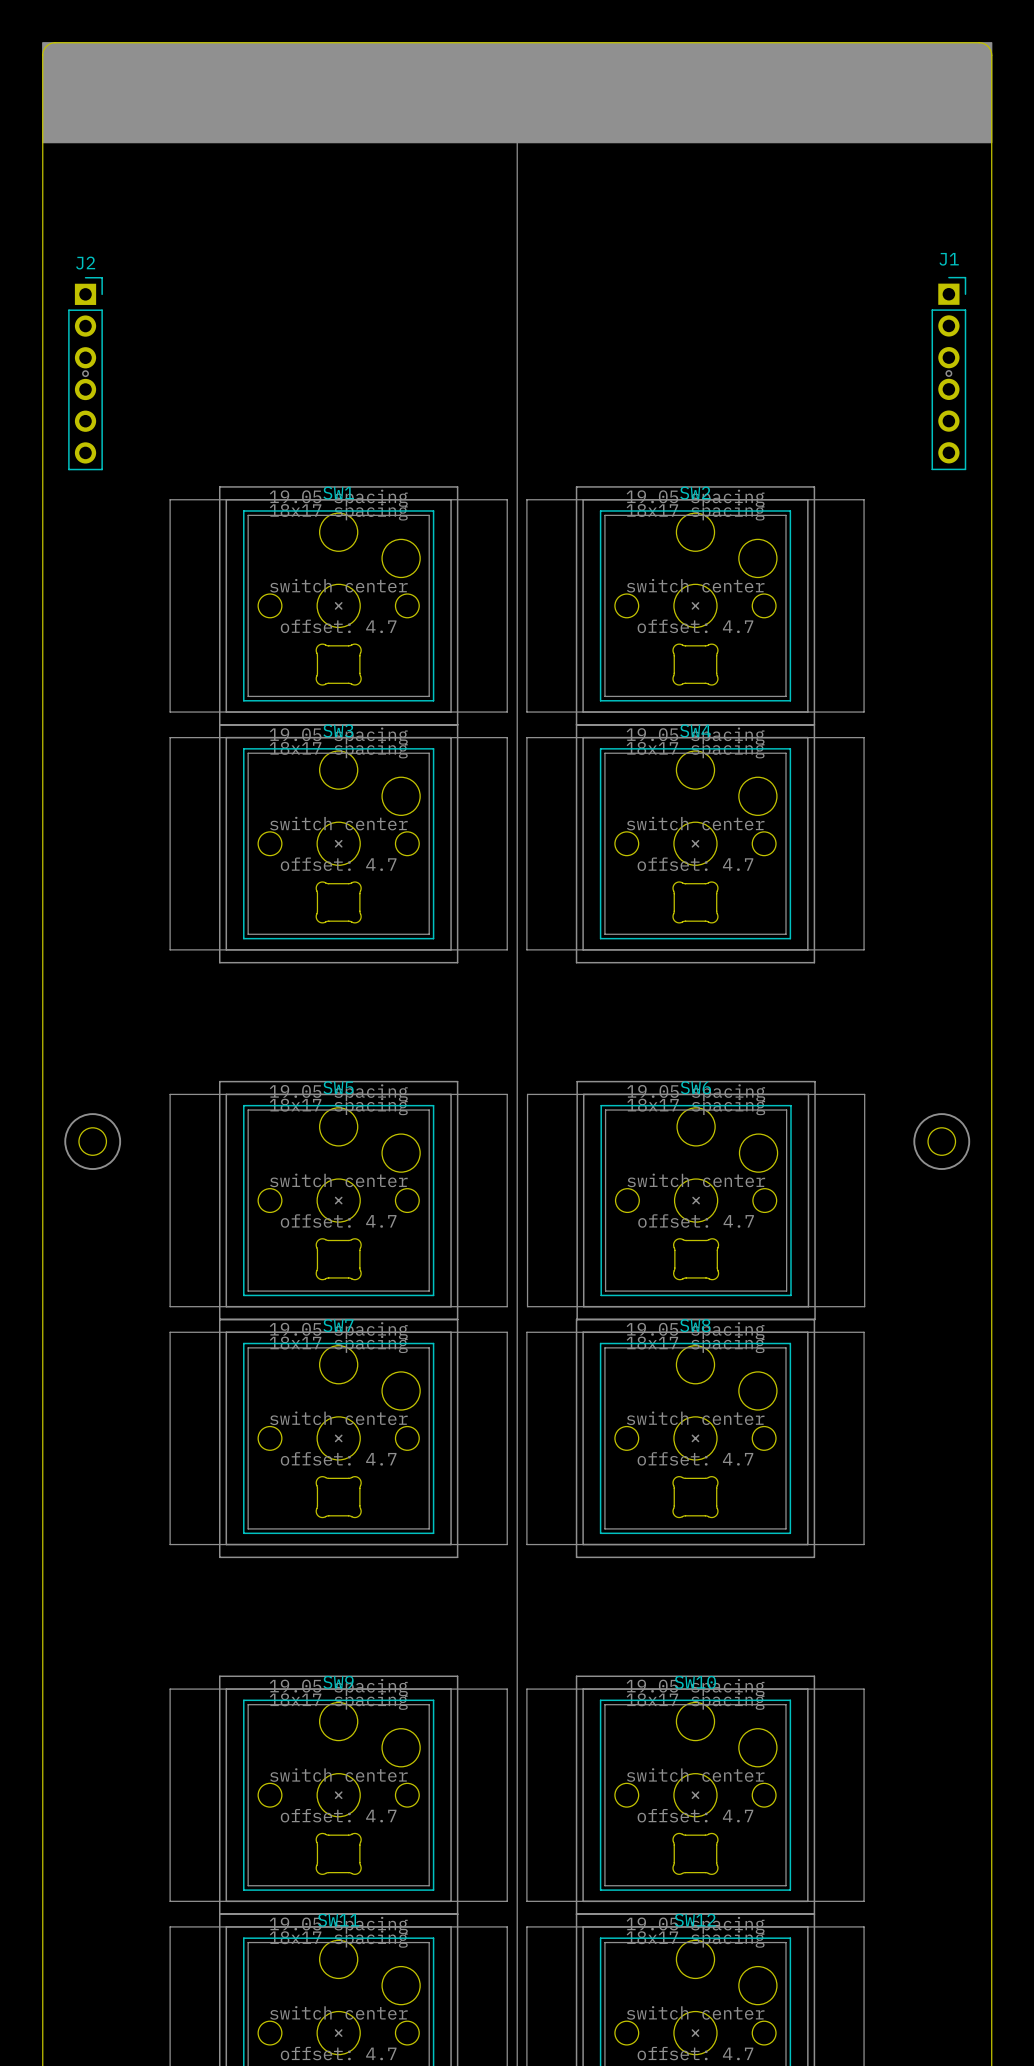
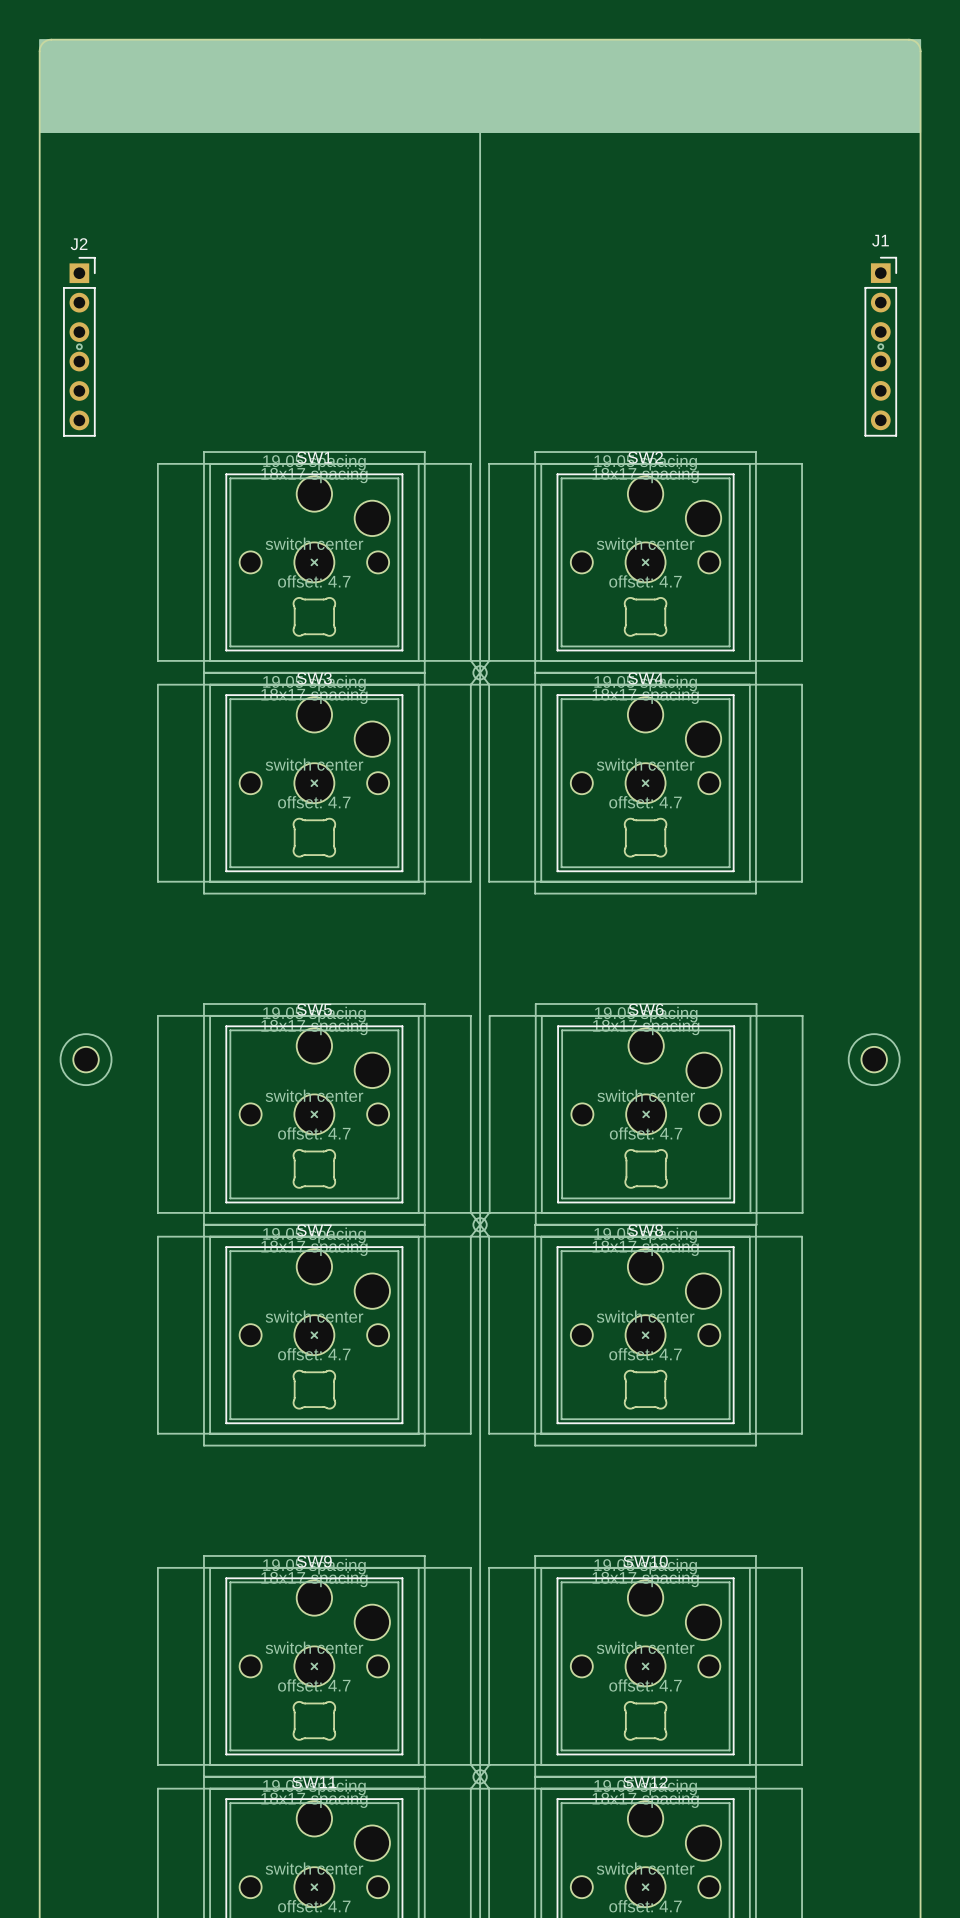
line: none -> (470, 660) (489, 660) (470, 684) (489, 684) (470, 660)
drawing: none -> [472, 665, 488, 681]
line: none -> (470, 1212) (489, 1236) (470, 1236) (489, 1212) (470, 1212)
drawing: none -> [472, 1217, 488, 1233]
line: none -> (471, 1764) (489, 1788) (471, 1788) (489, 1764) (471, 1764)
drawing: none -> [472, 1769, 488, 1785]

